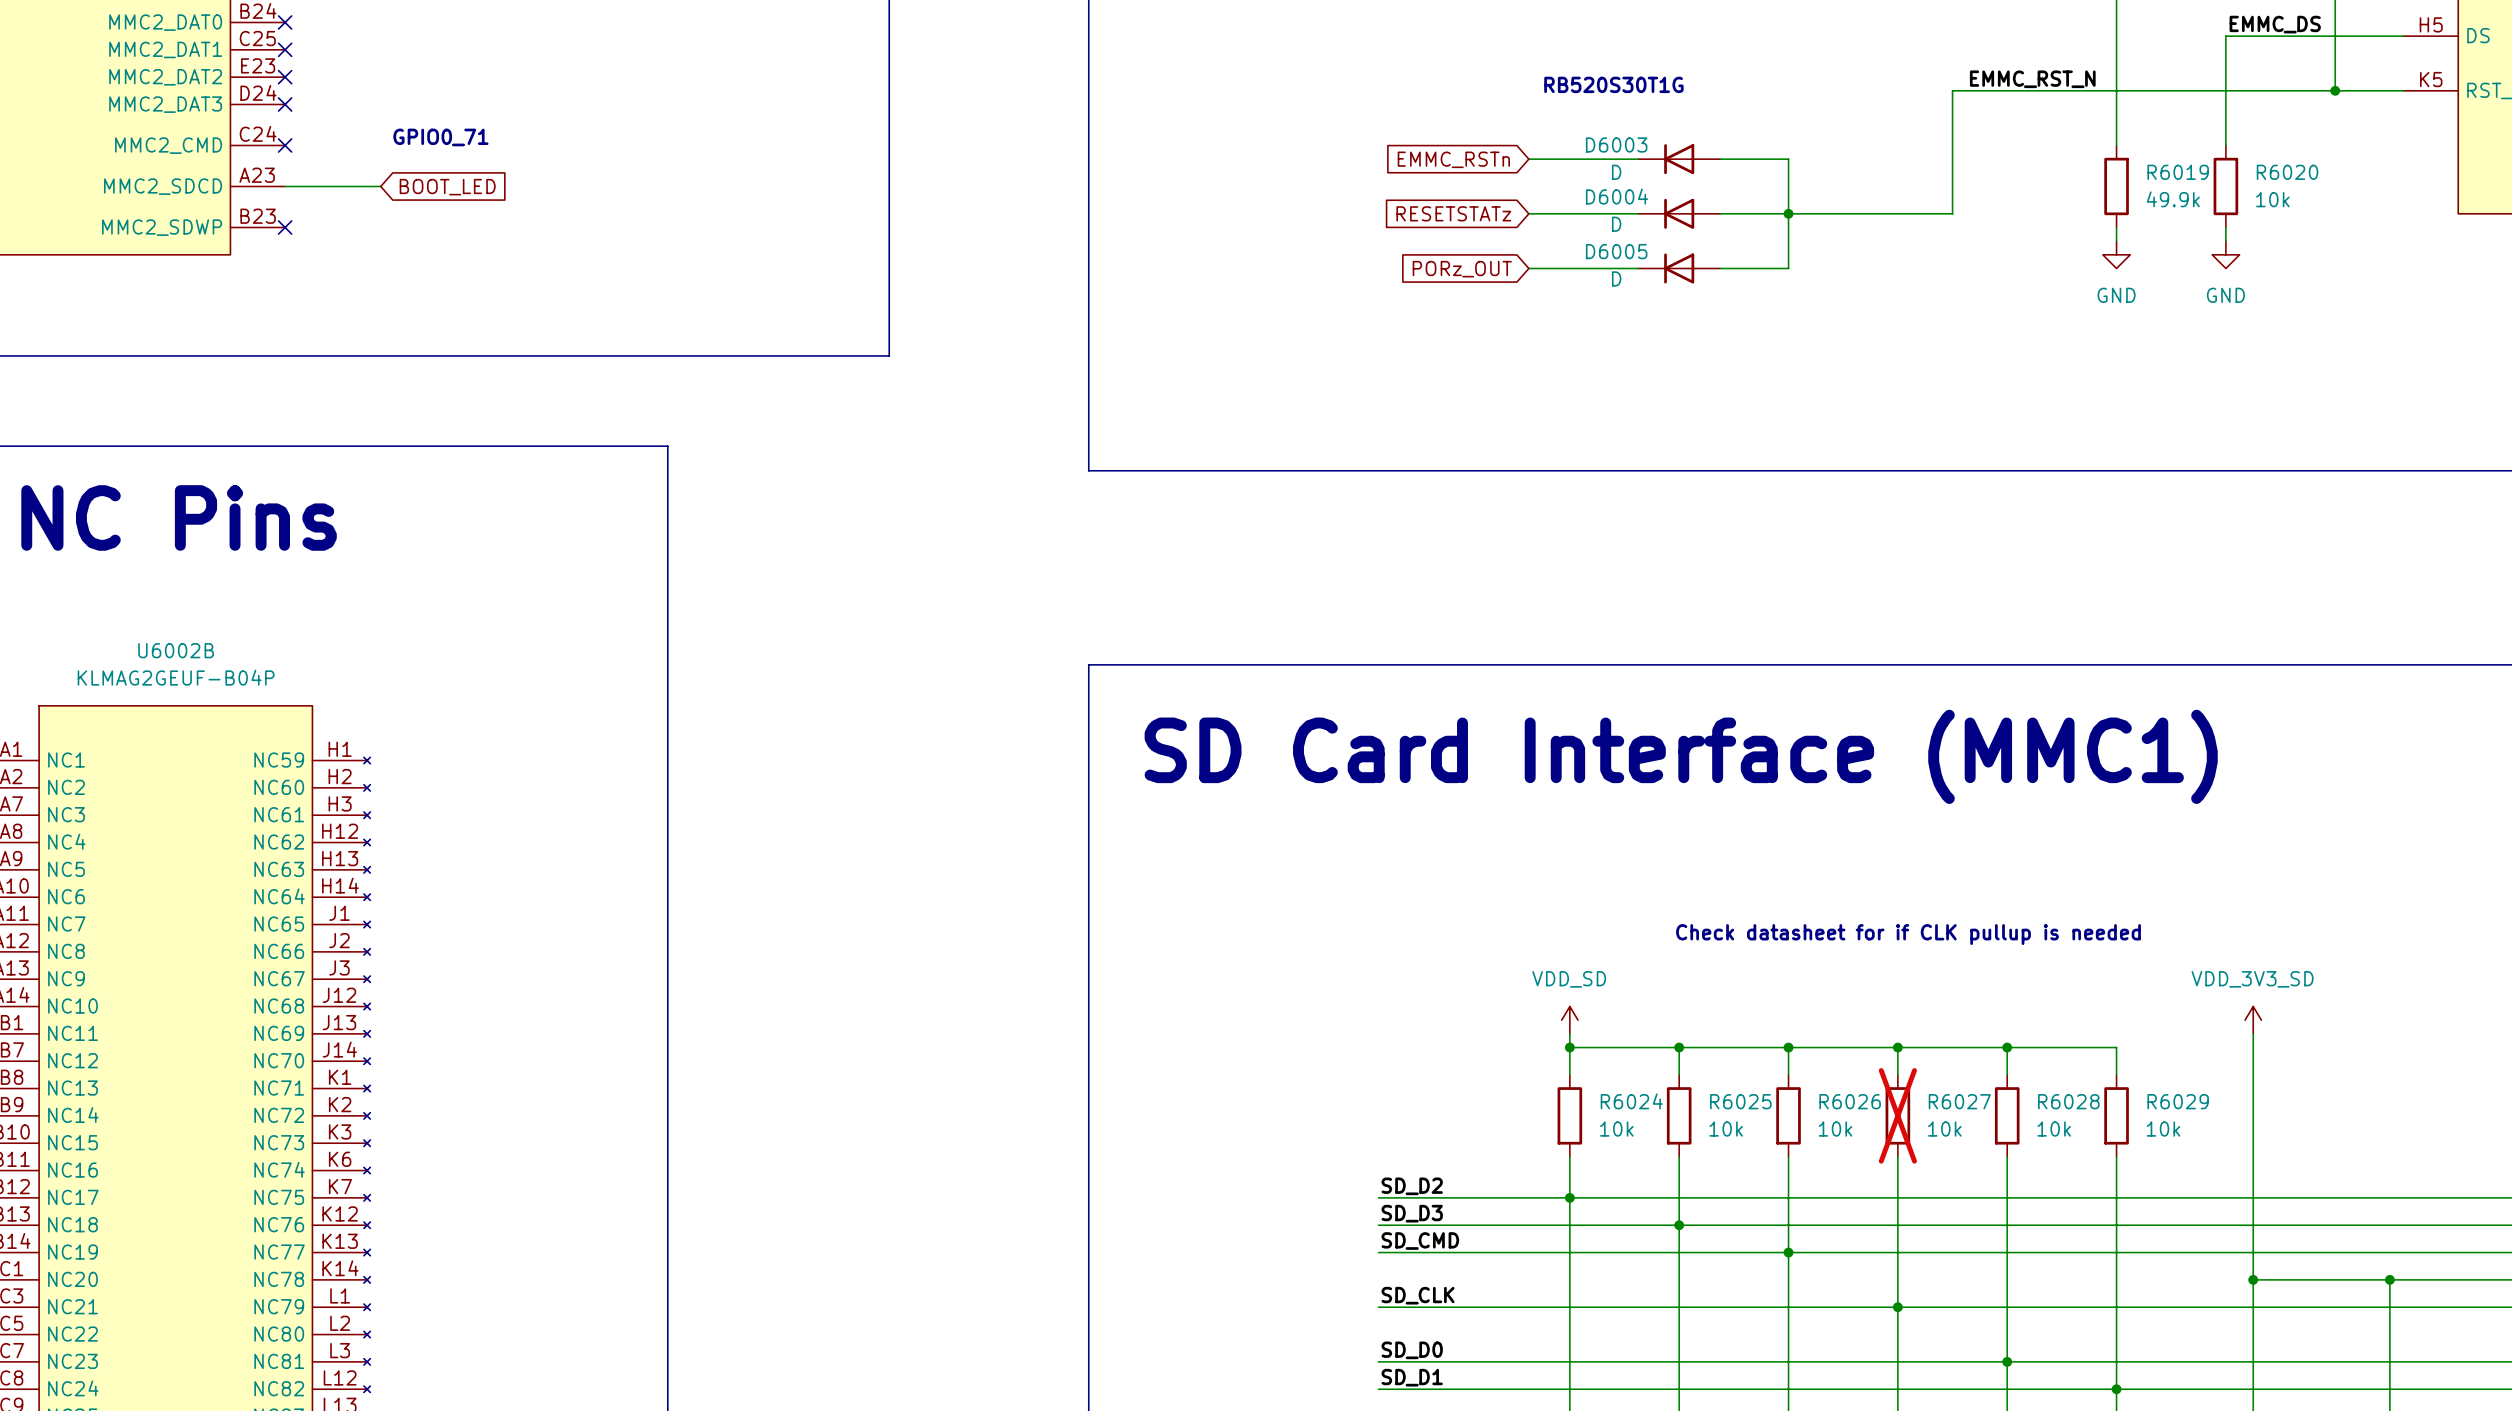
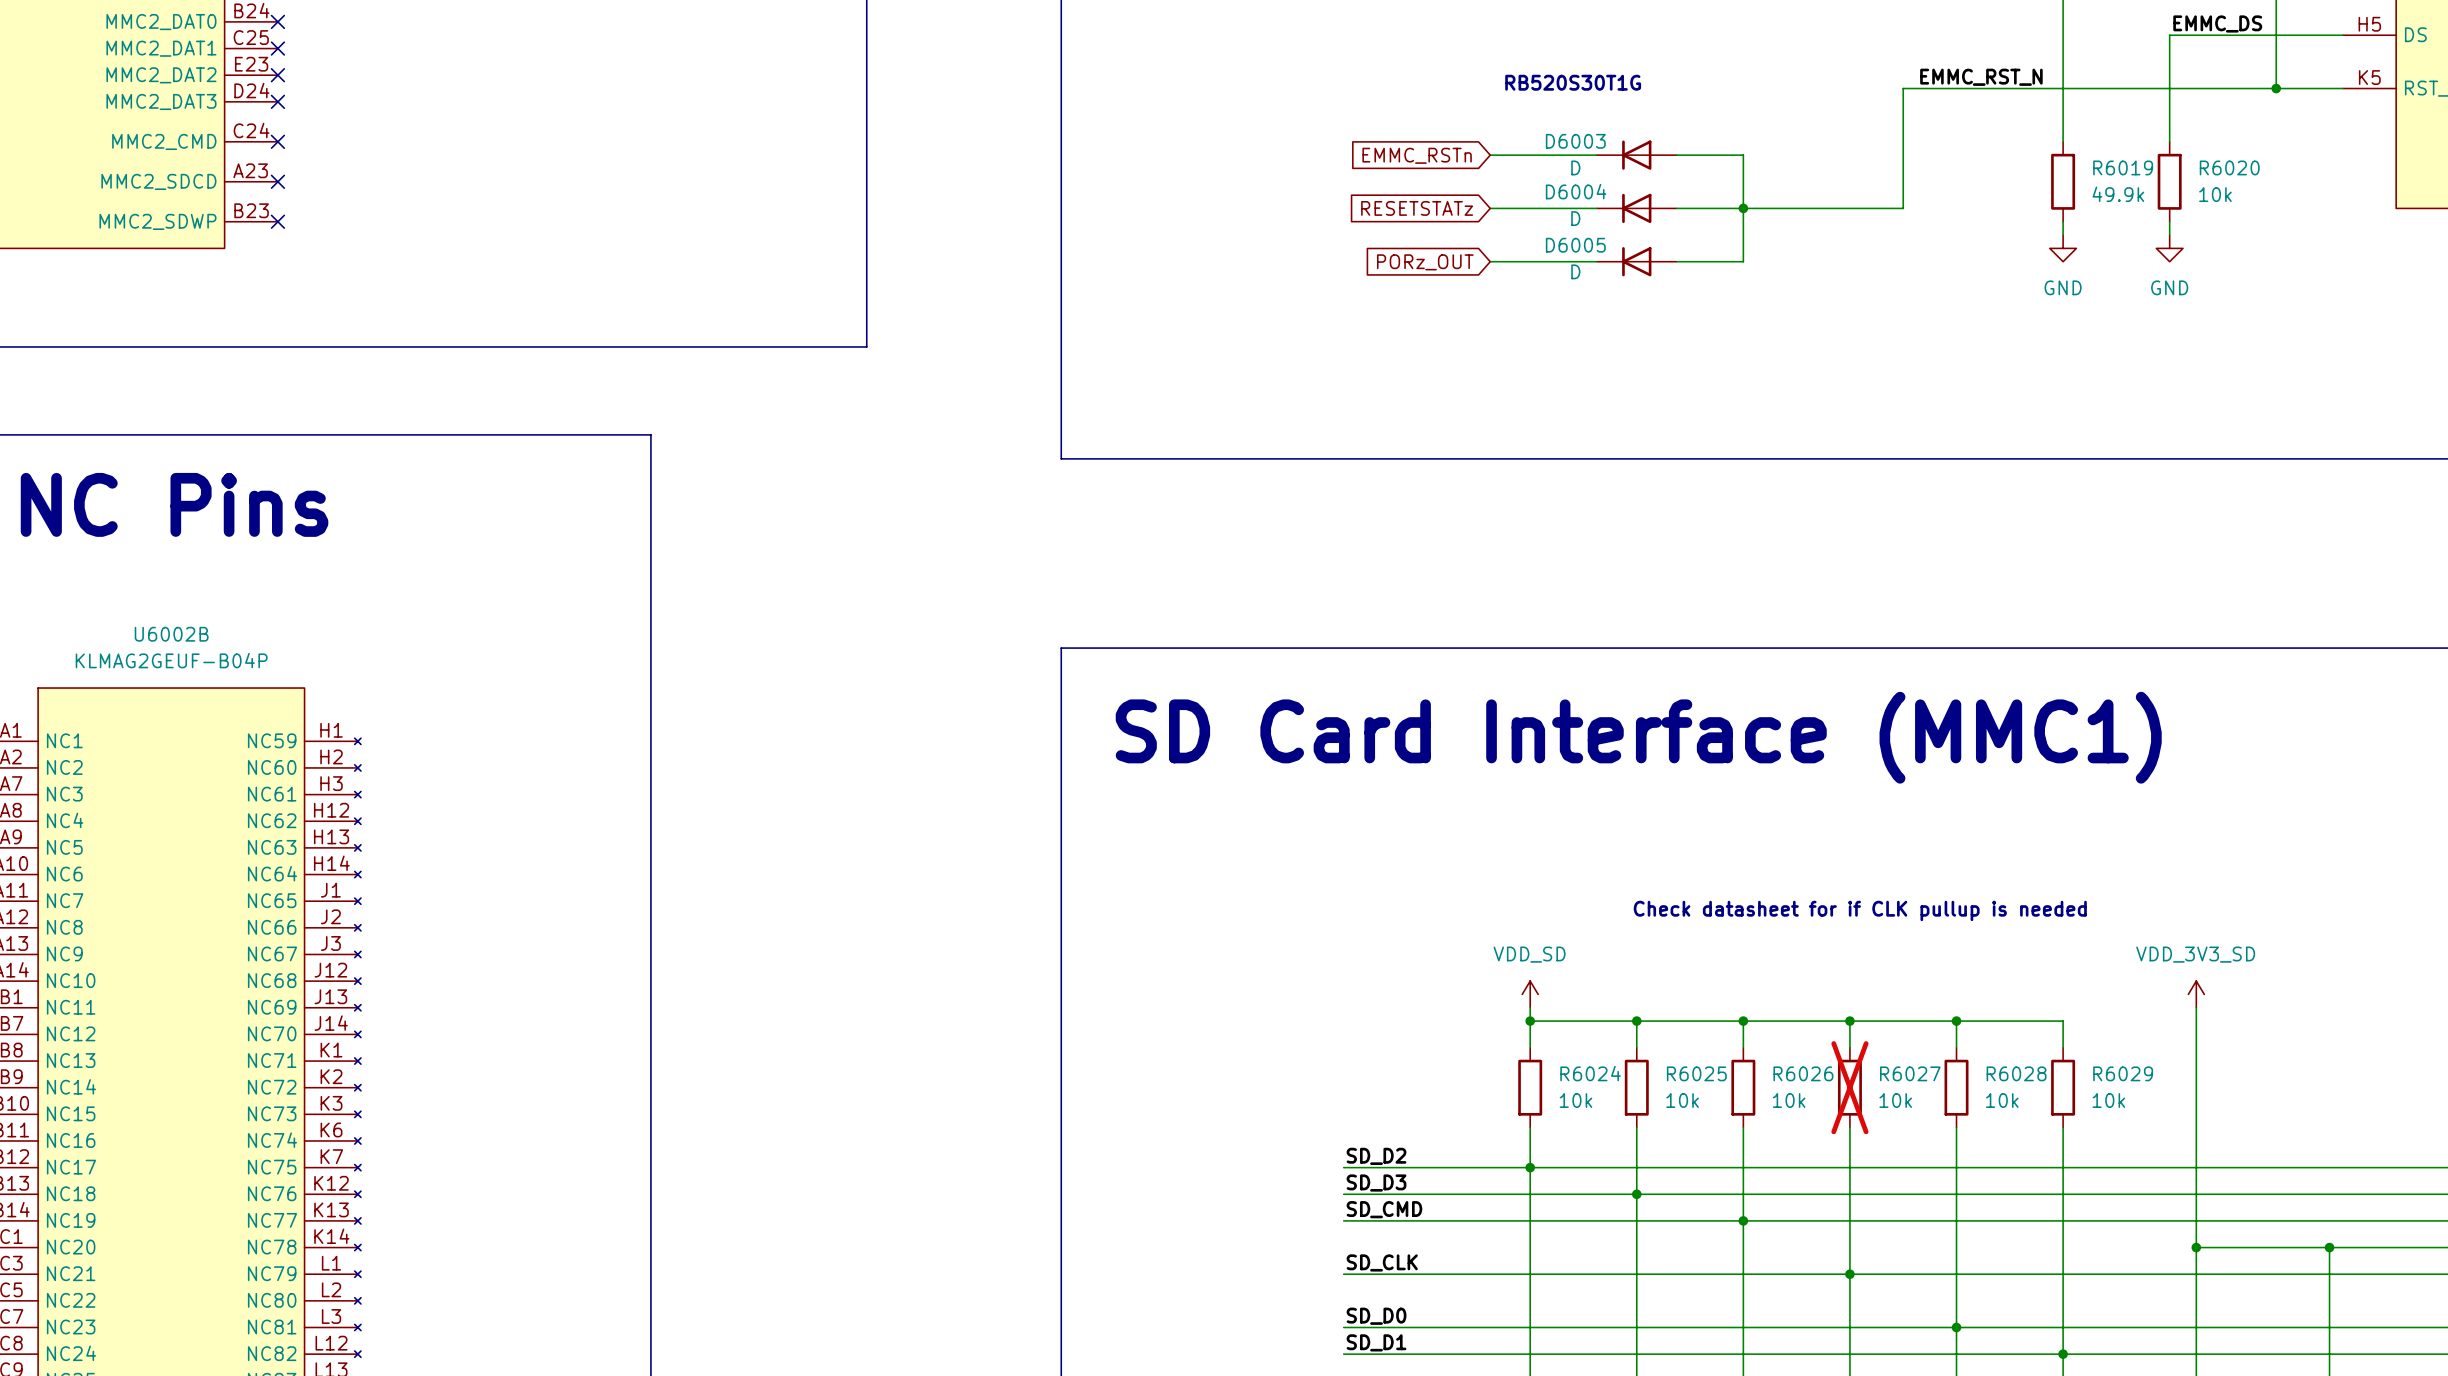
text: GPIO0_71 (440, 137) -> none
wire: (285, 186) (380, 186) -> none
no-connect mark: none -> (277, 181)
global label: BOOT_LED (447, 187) -> none

